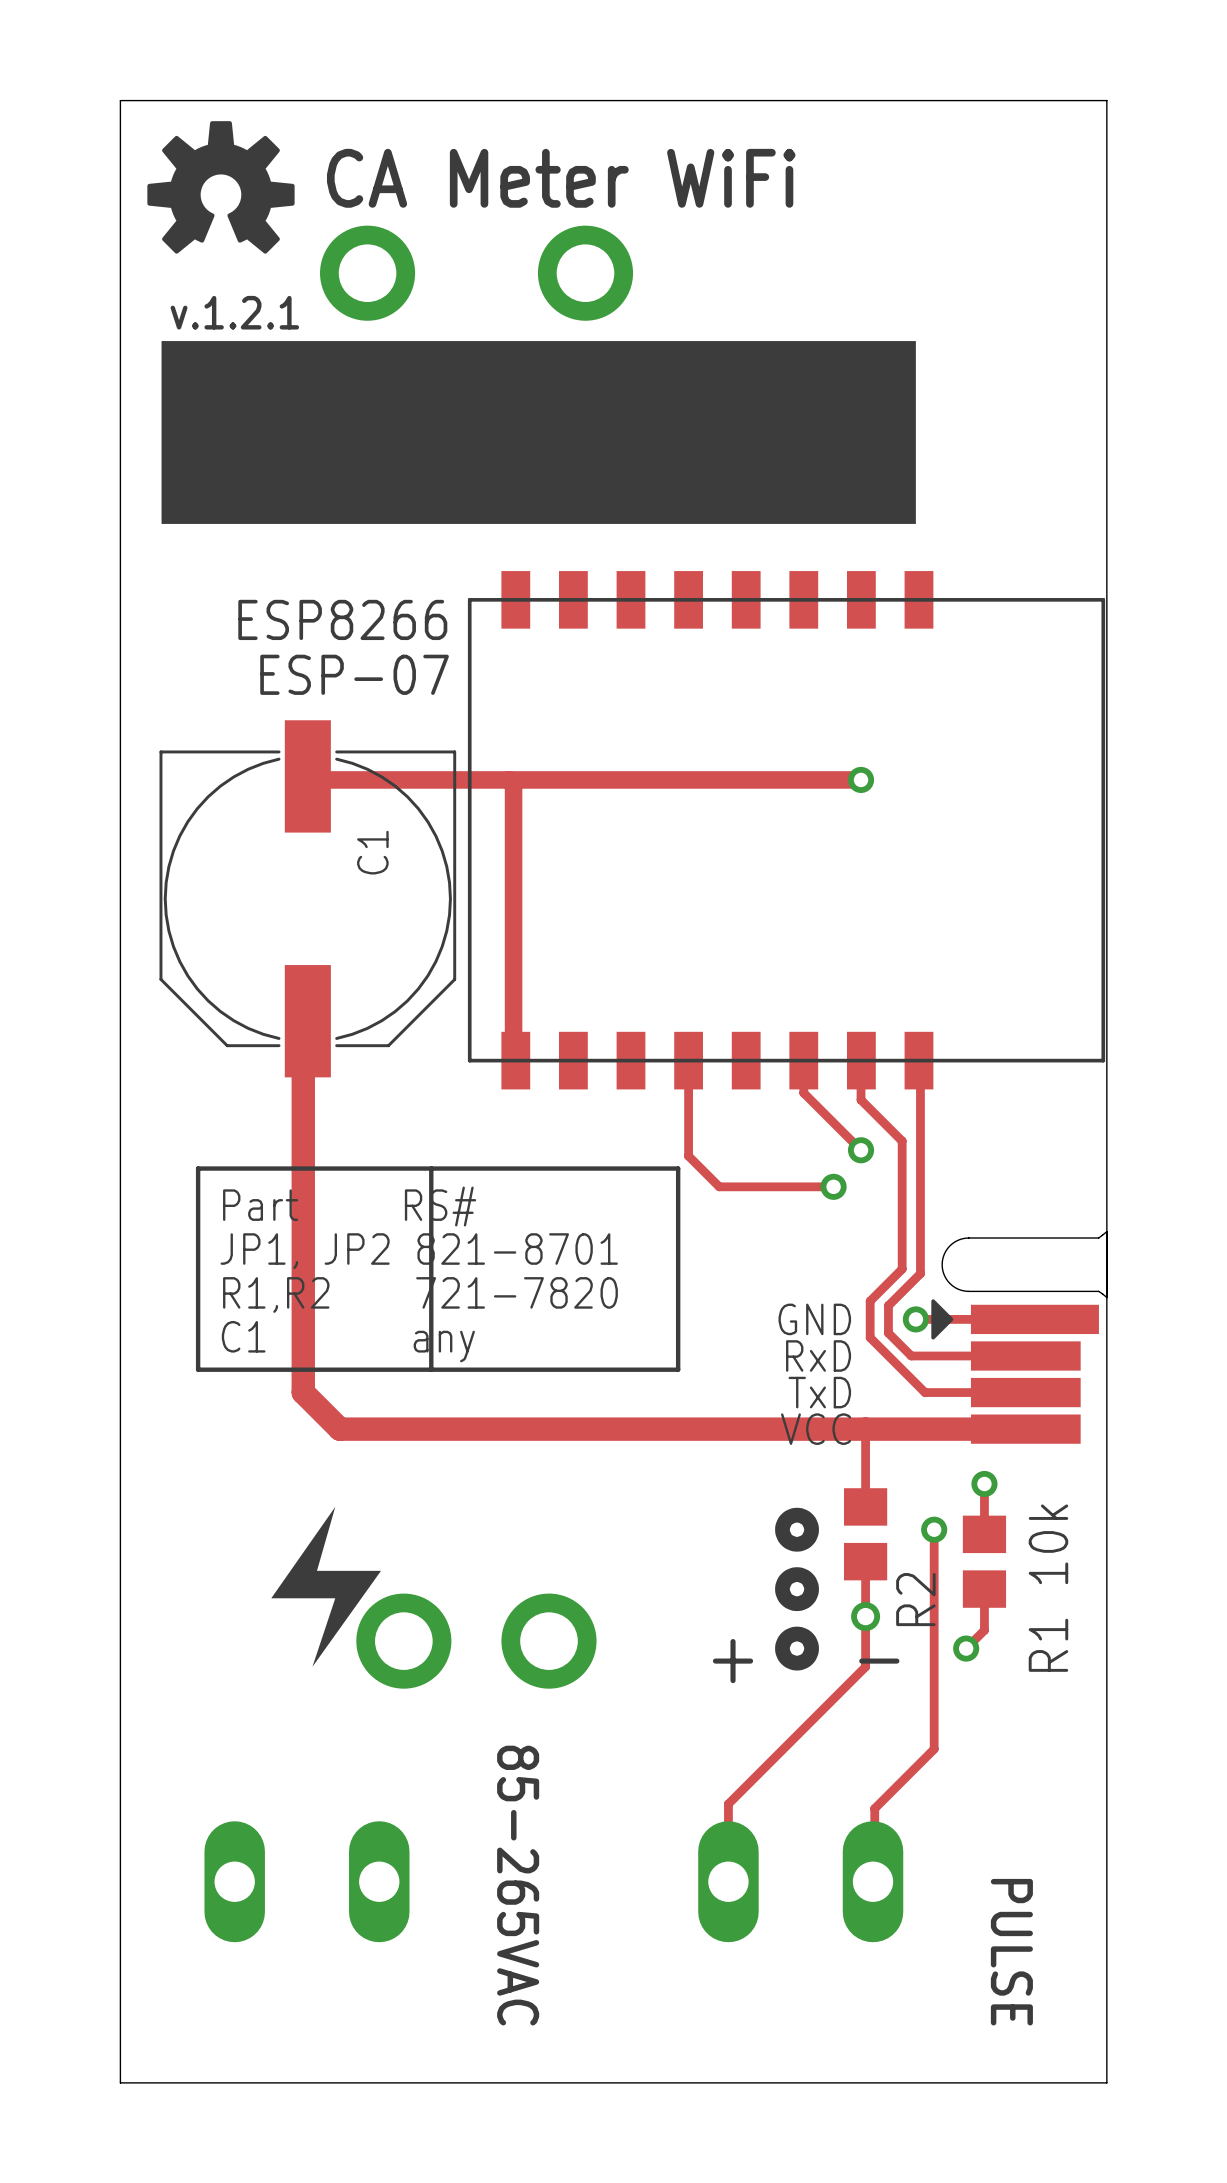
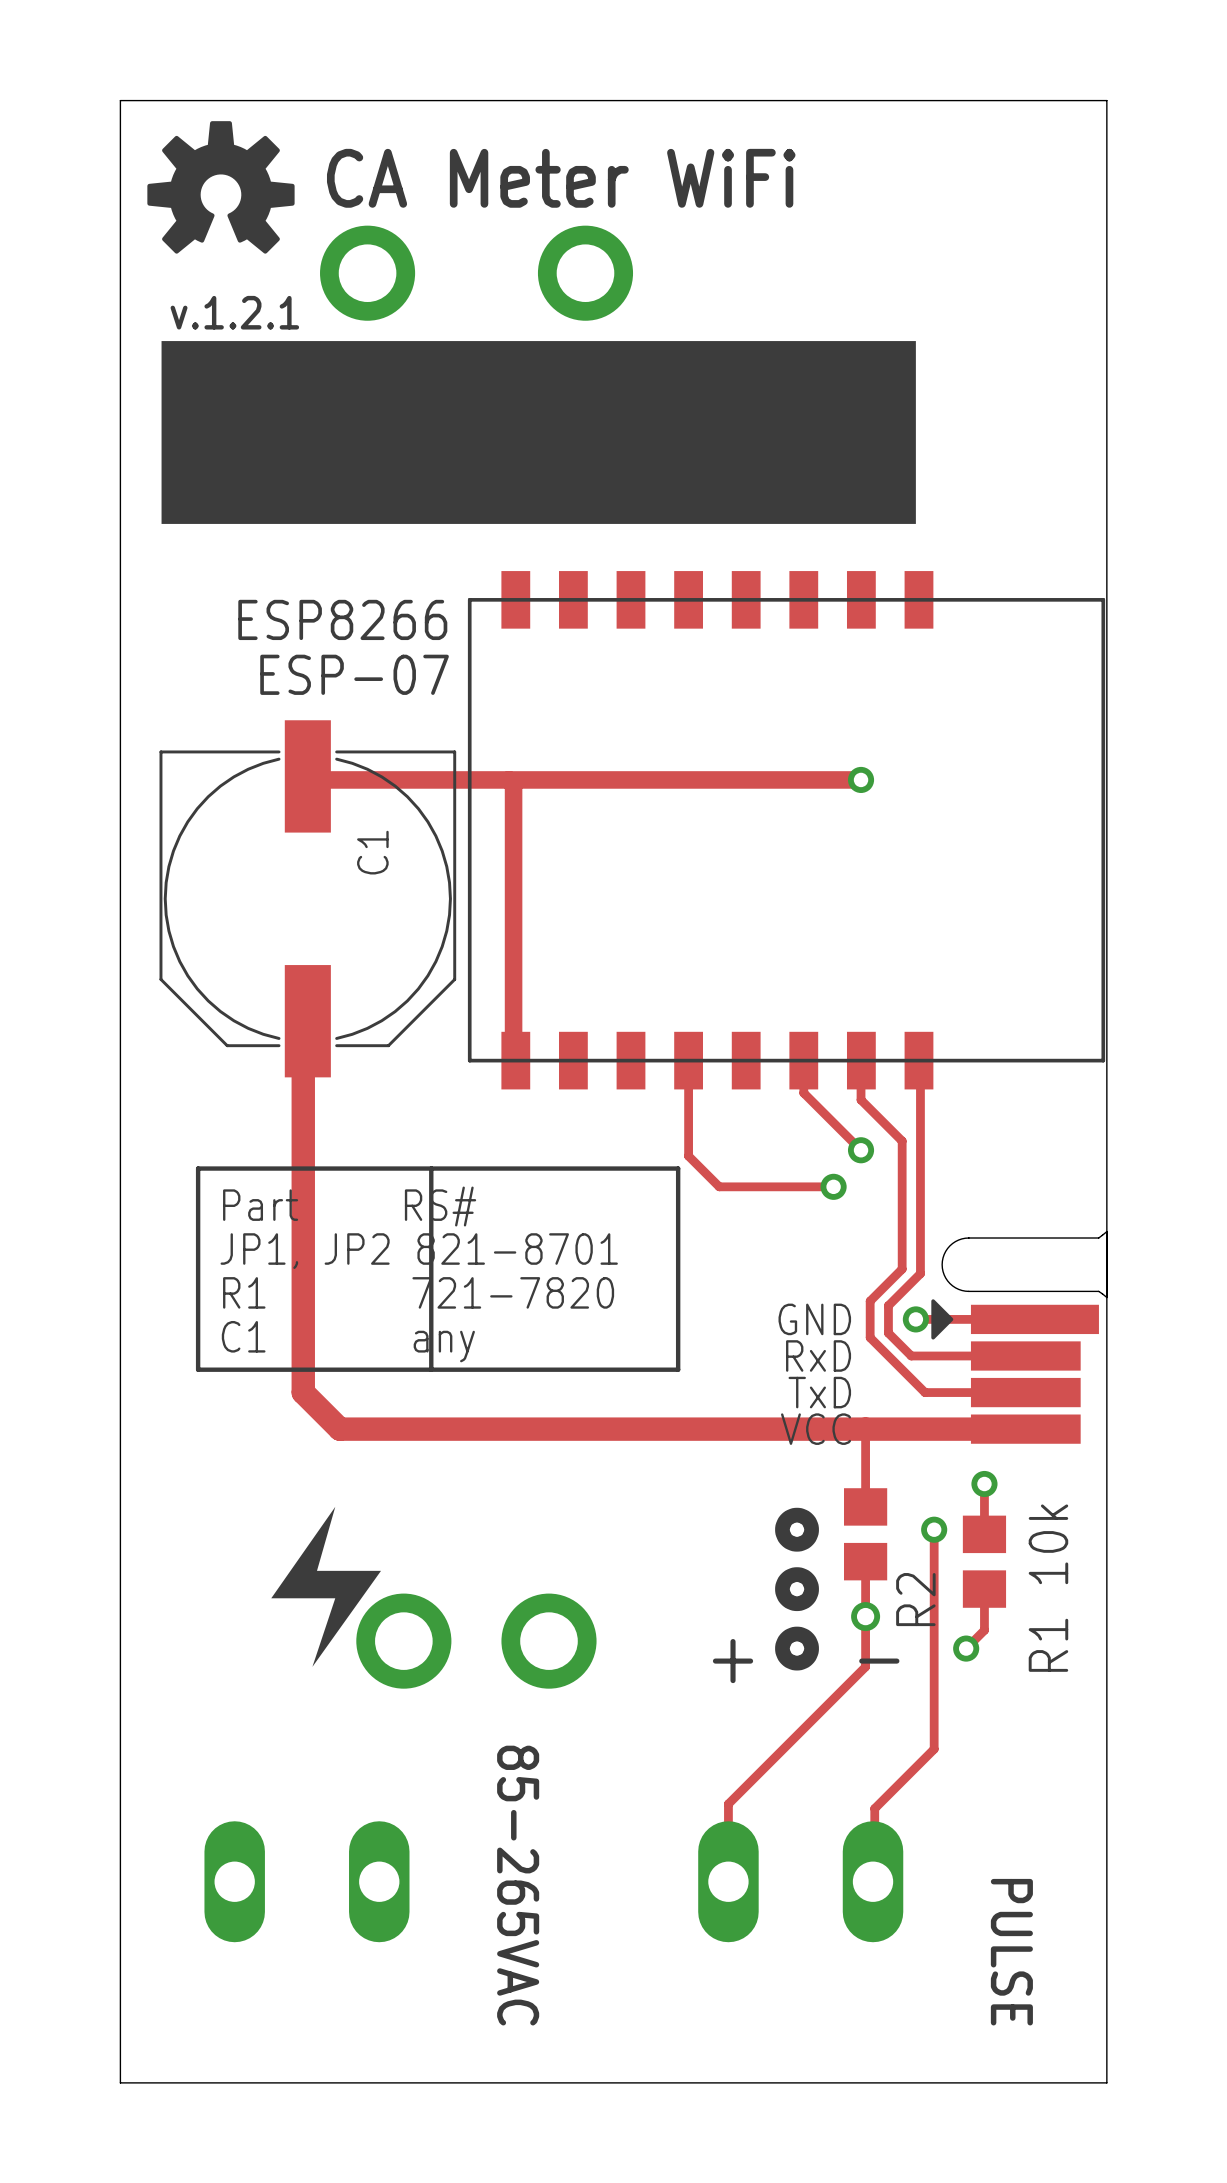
text: R1,R2 721-7820 (420, 1294) -> R1 721-7820 (418, 1292)

